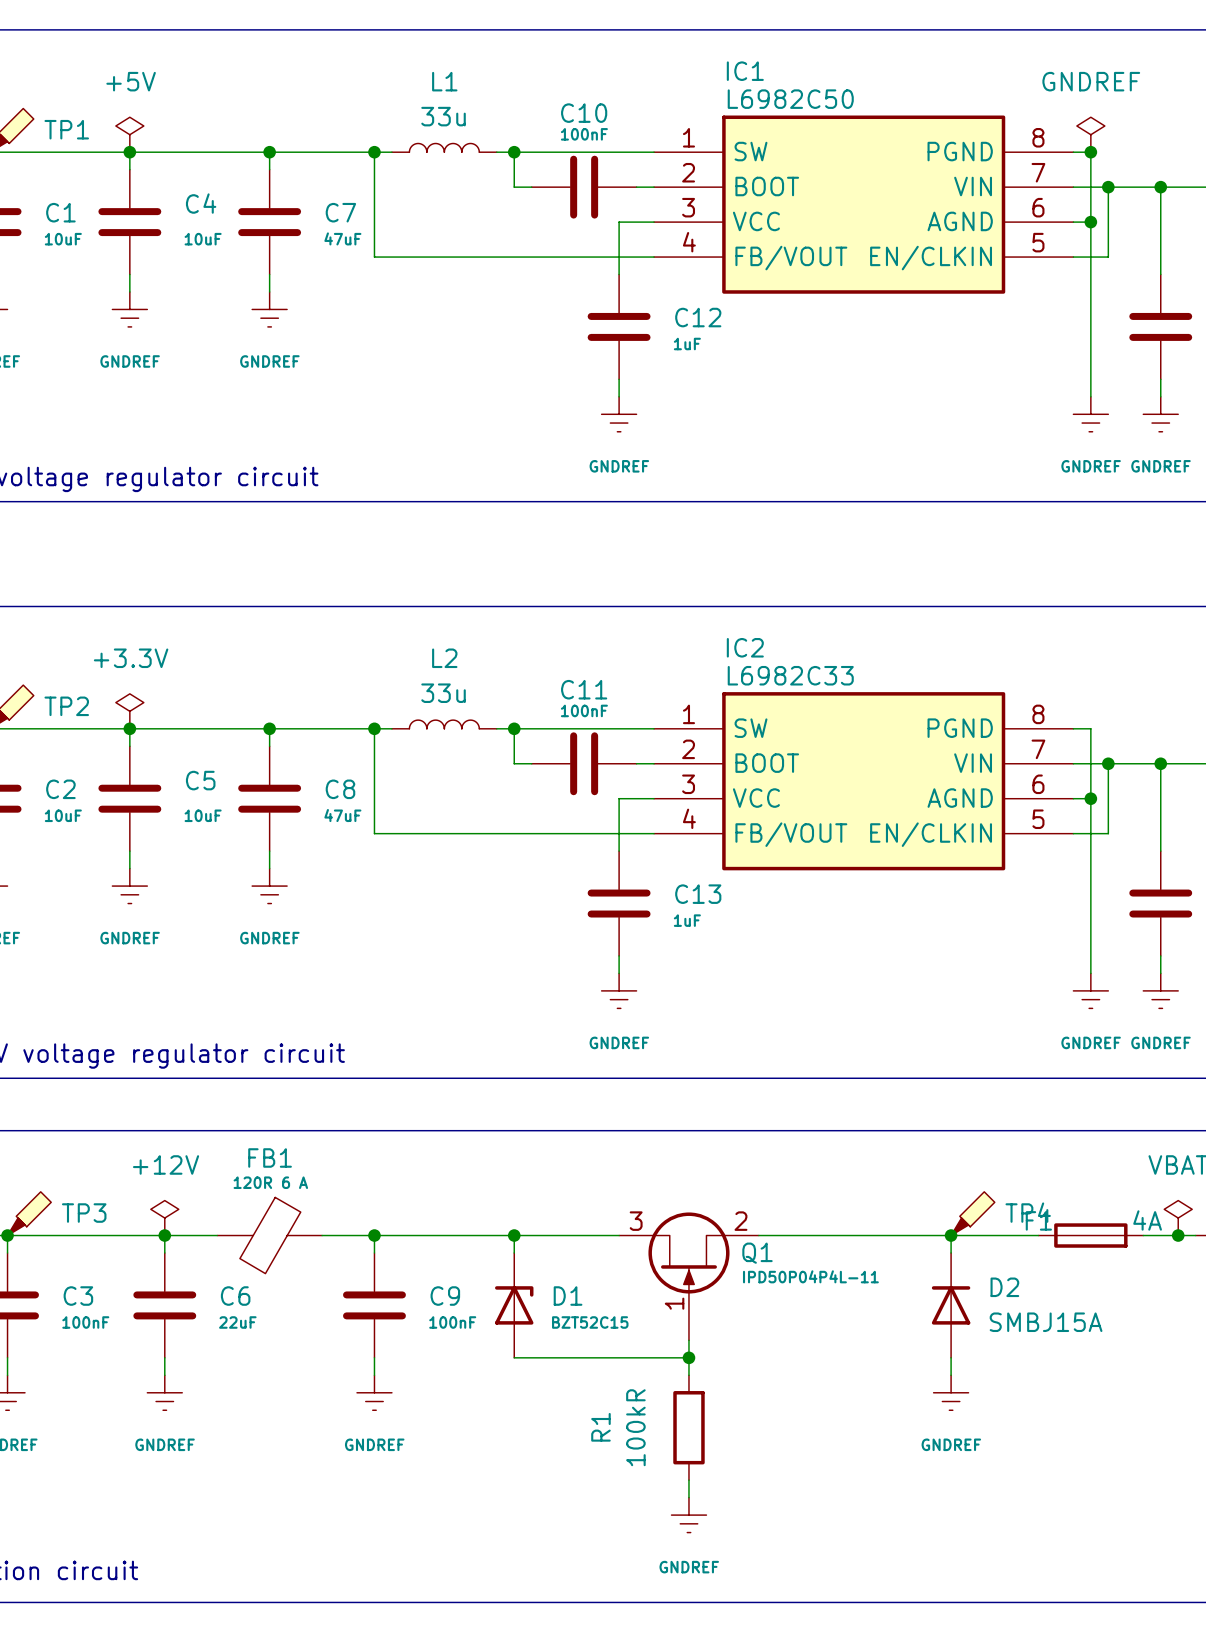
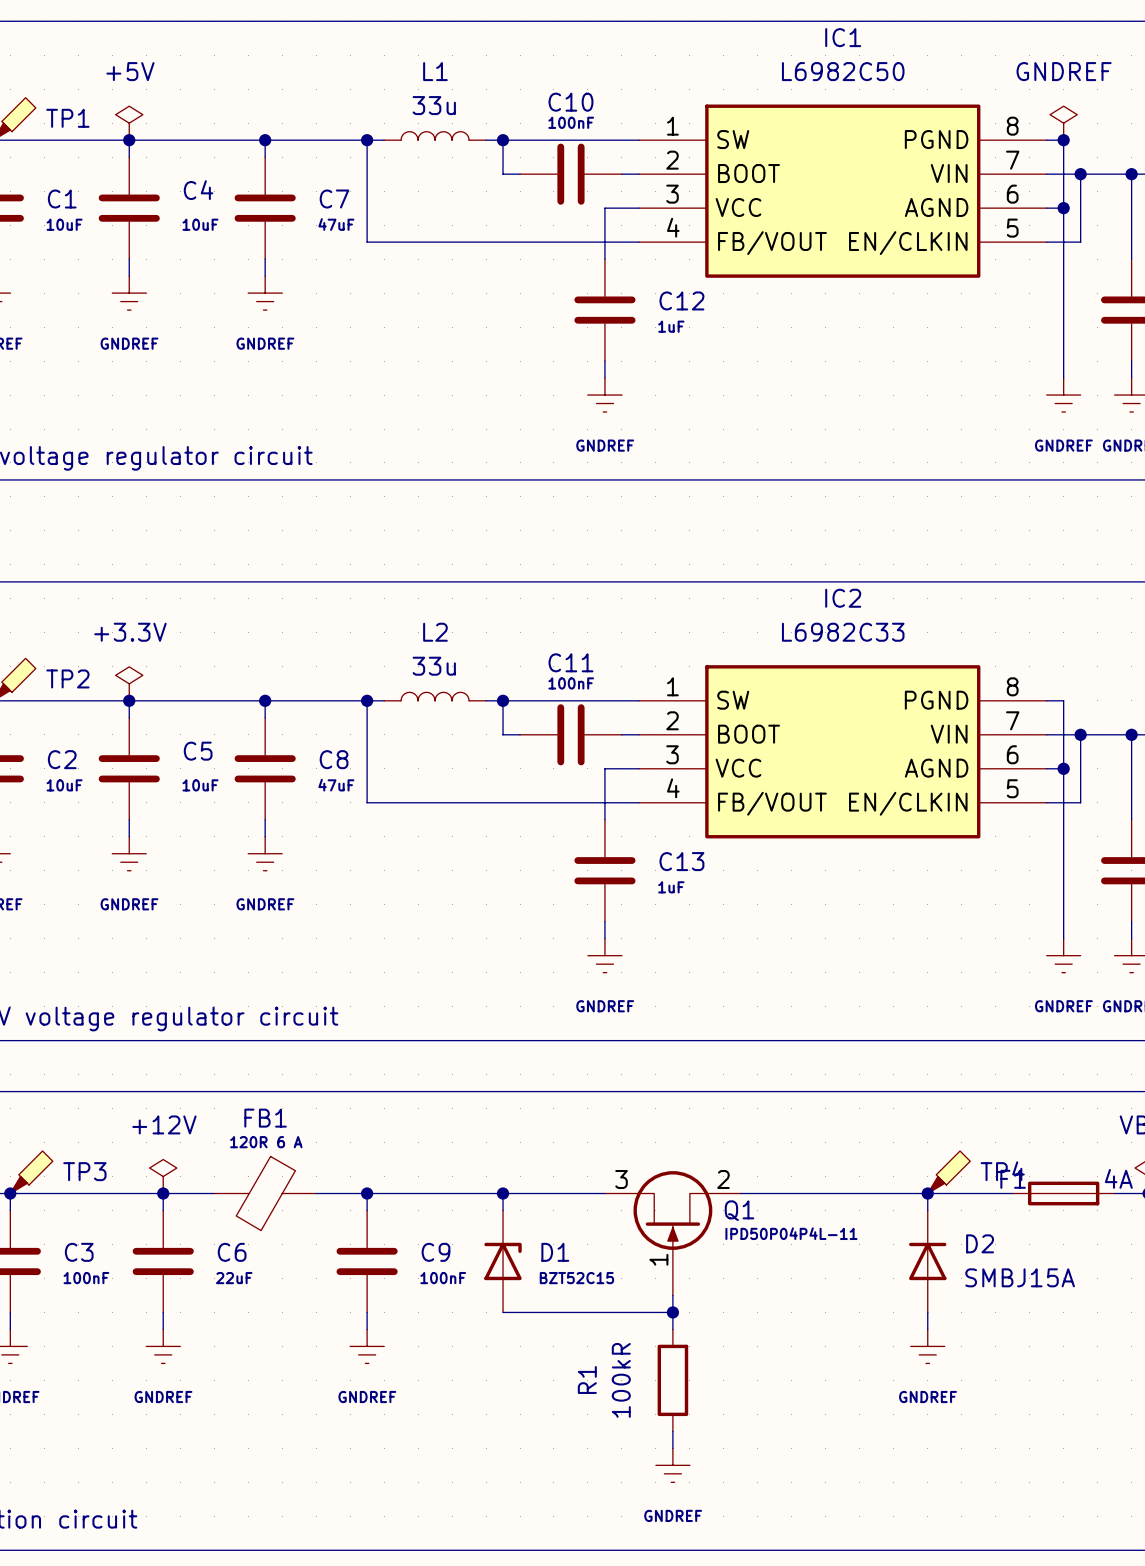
IC1 name position: IC1 (745, 71) -> IC1 (843, 37)
IC1 value position: L6982C50 (790, 99) -> L6982C50 (843, 71)
IC2 name position: IC2 (745, 647) -> IC2 (843, 598)
IC2 value position: L6982C33 (790, 675) -> L6982C33 (843, 632)

